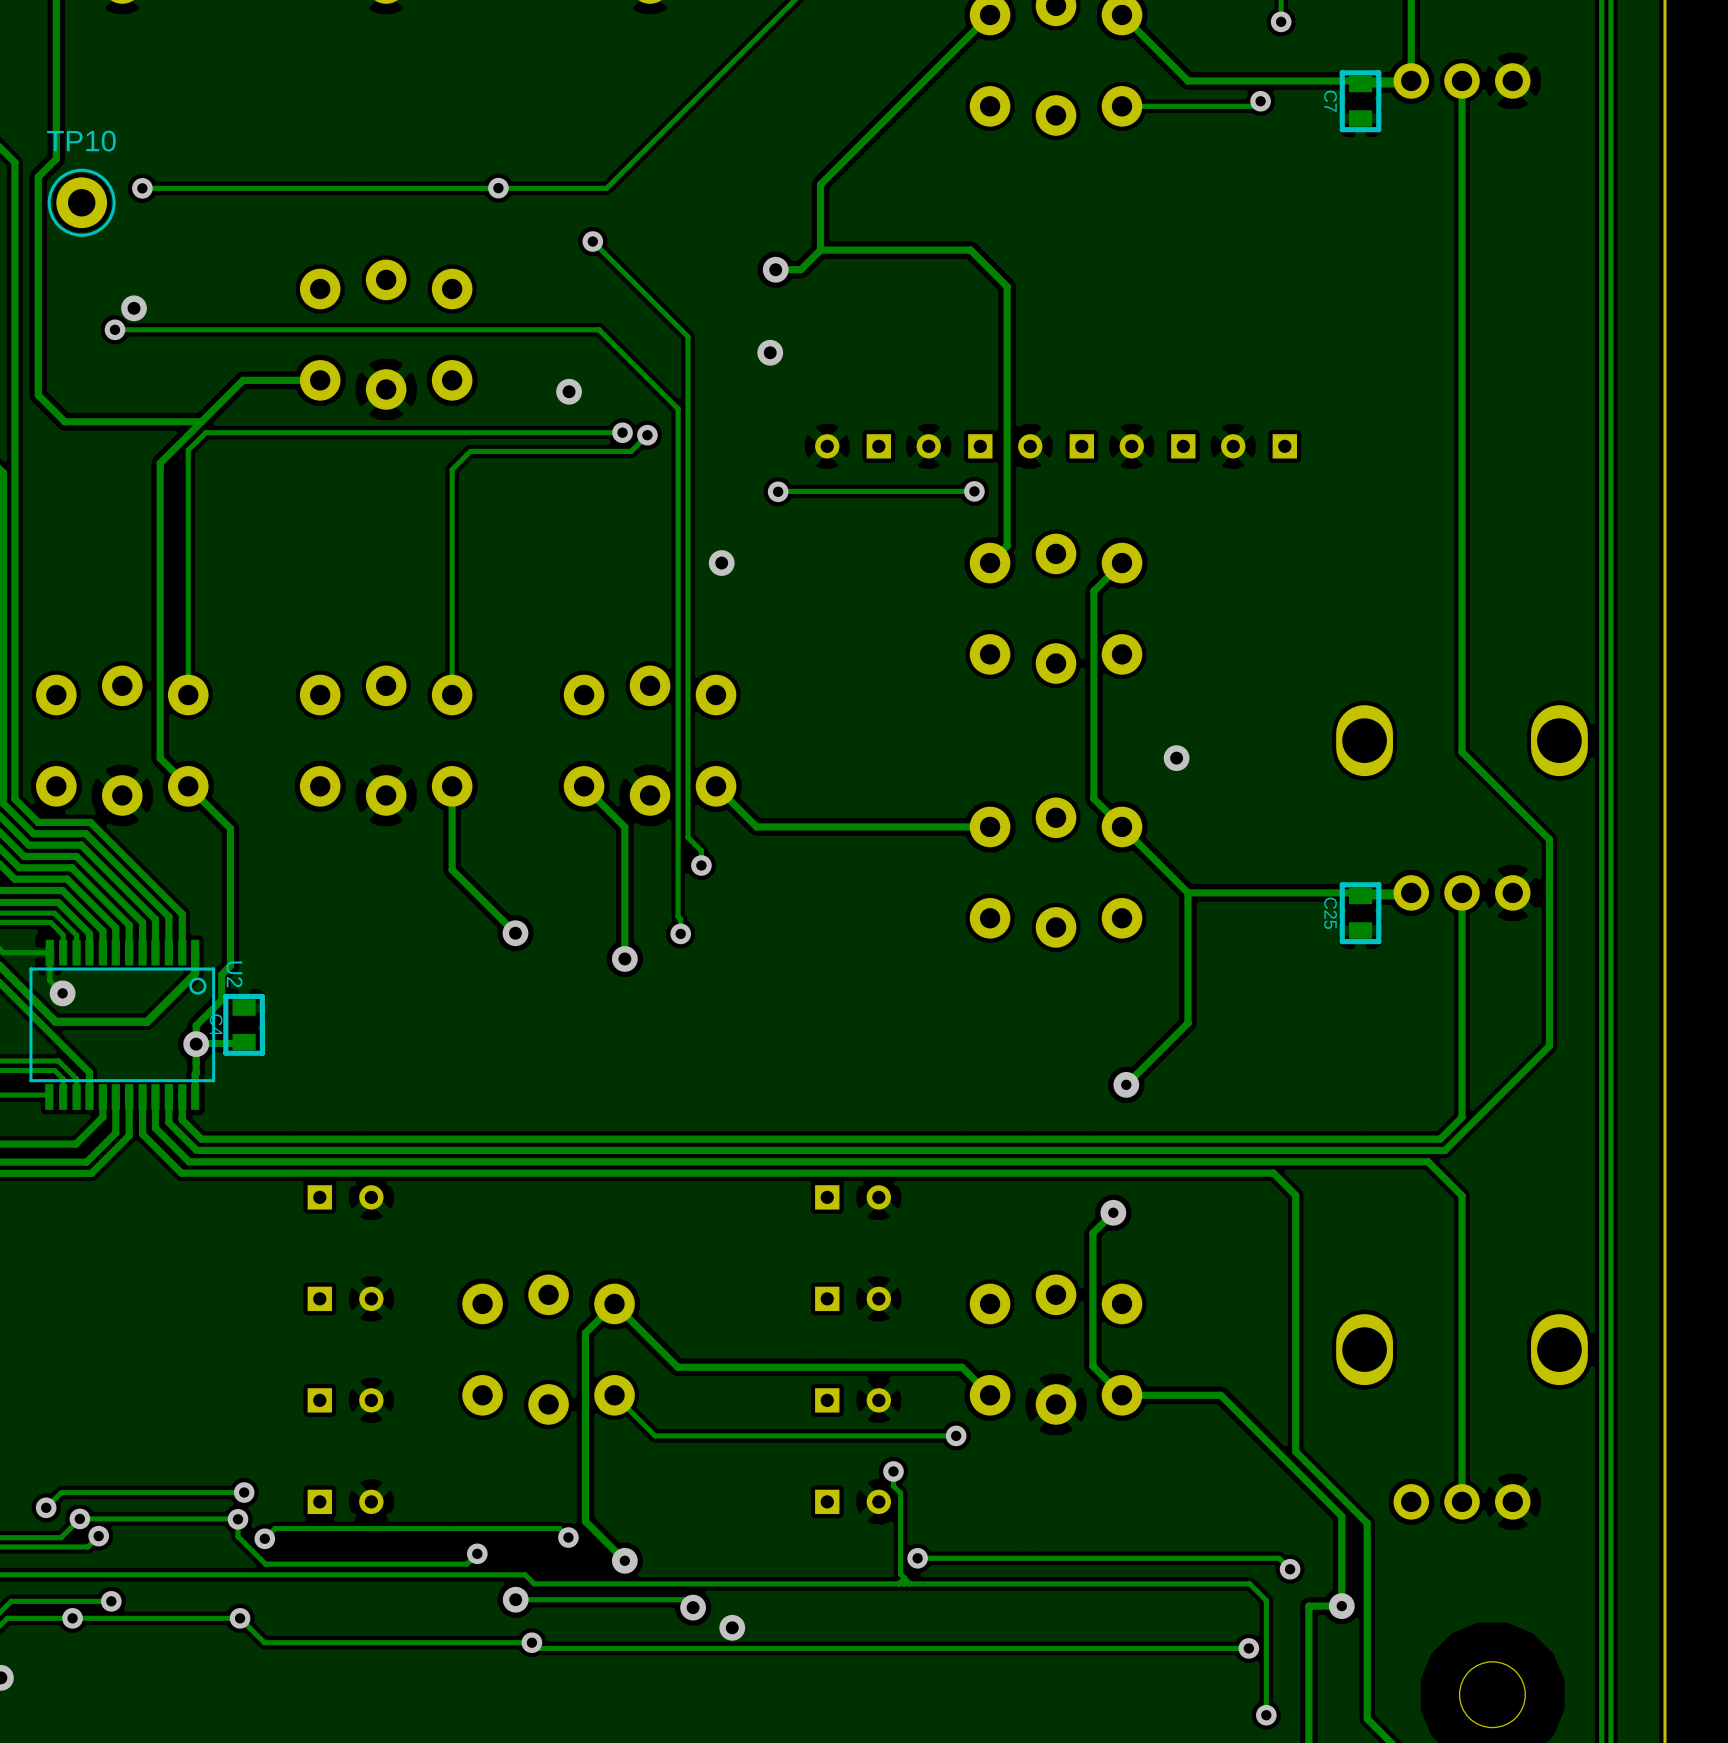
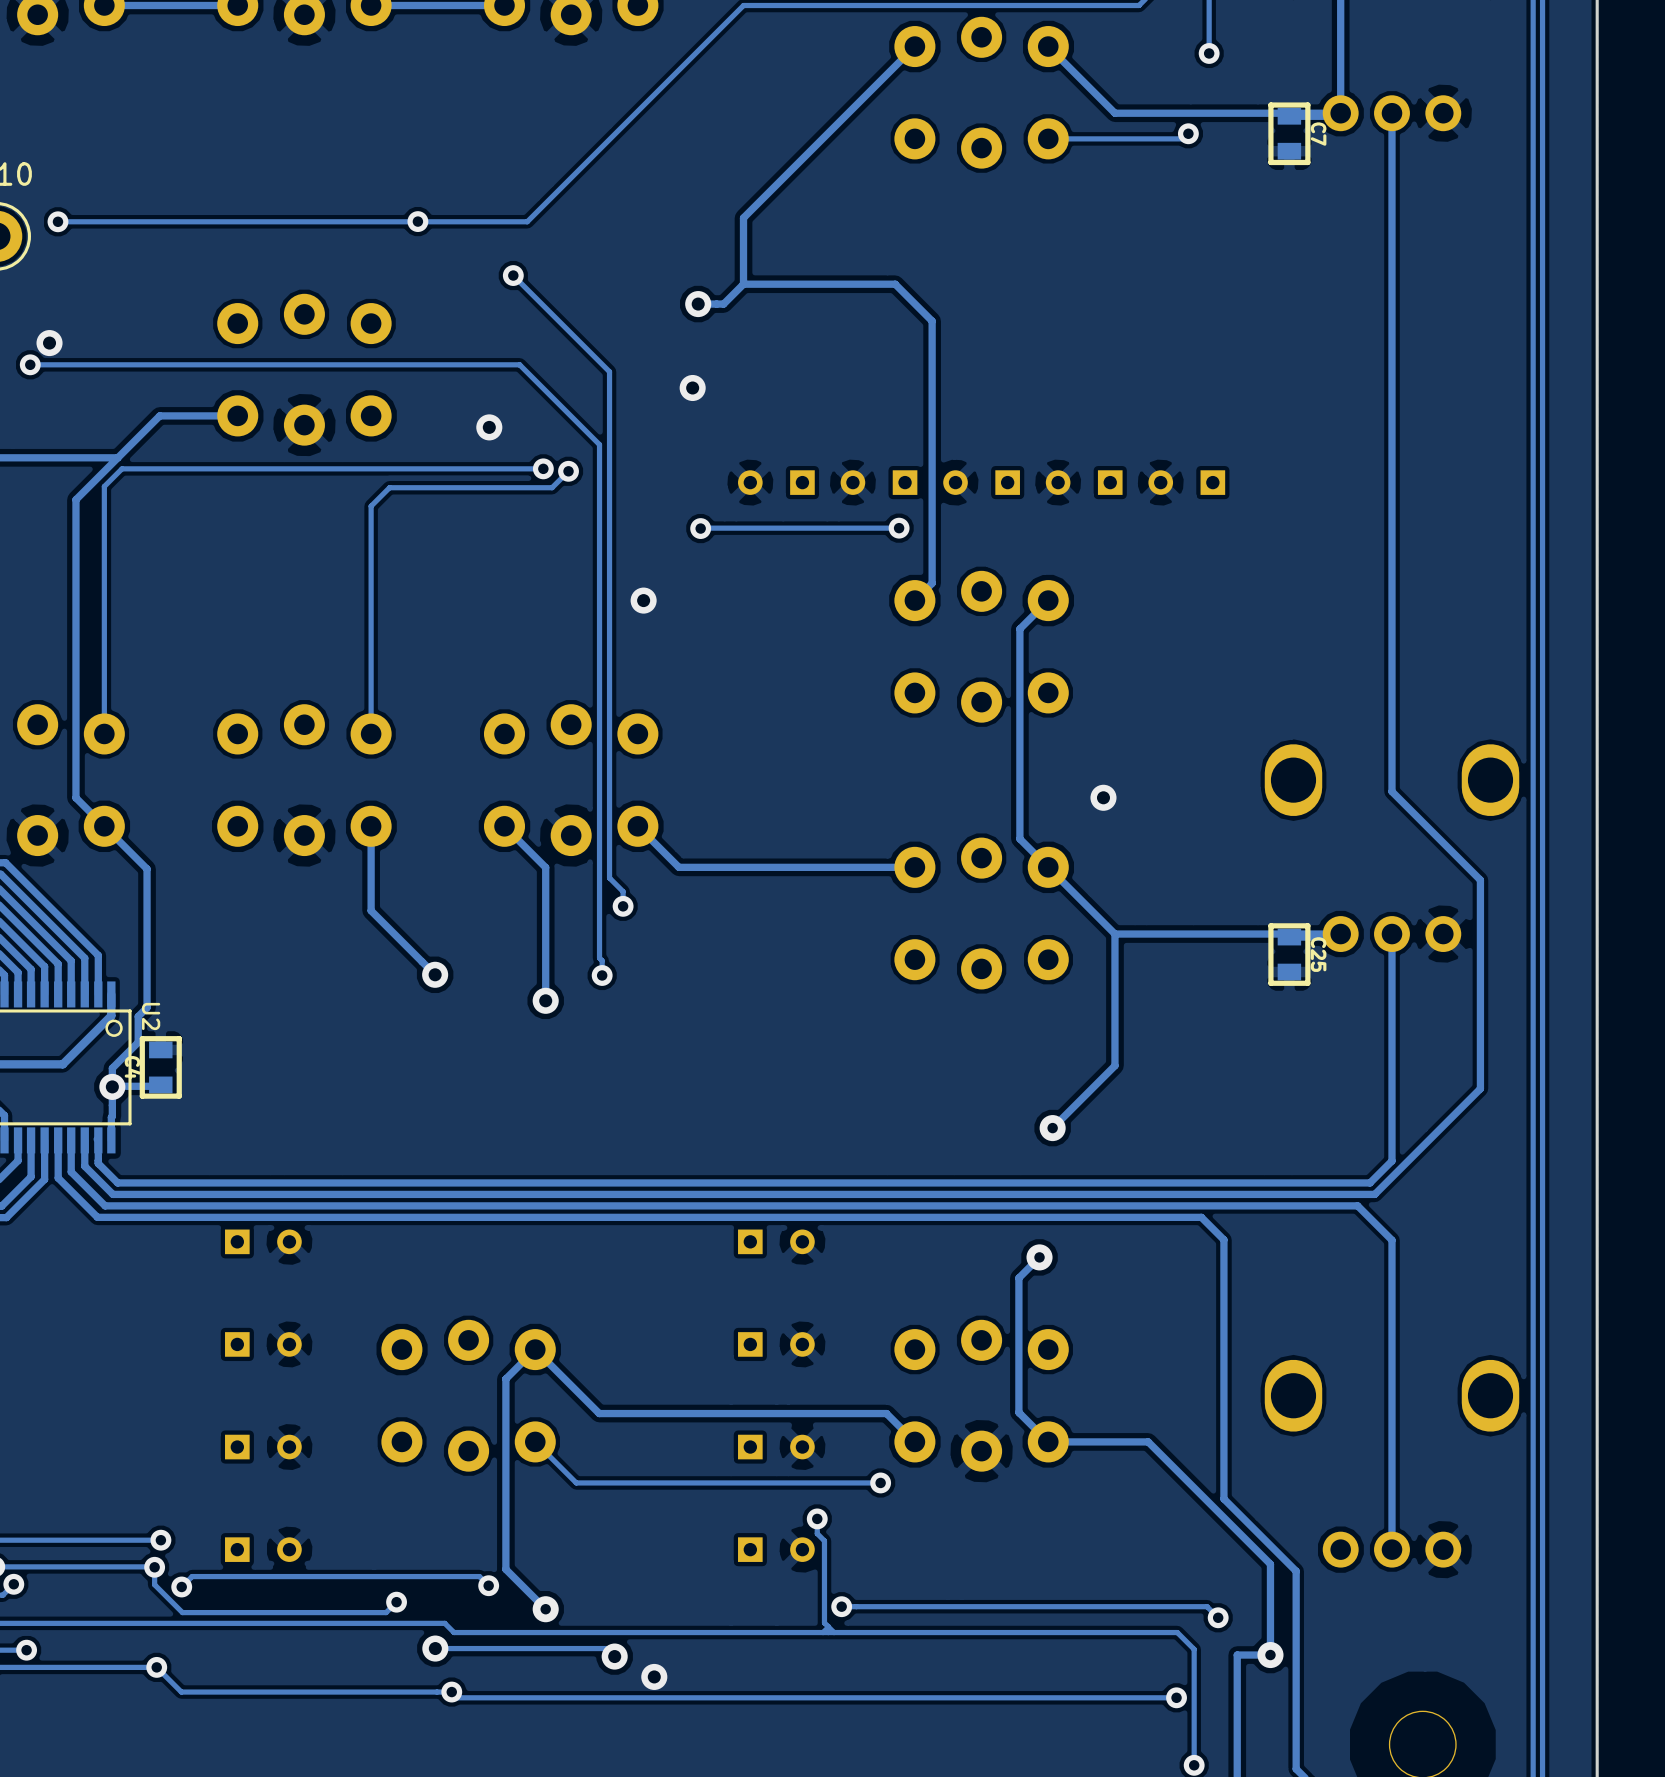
C7 name position: C7 (1330, 101) -> C7 (1318, 134)
C25 name position: C25 (1330, 913) -> C25 (1318, 954)

